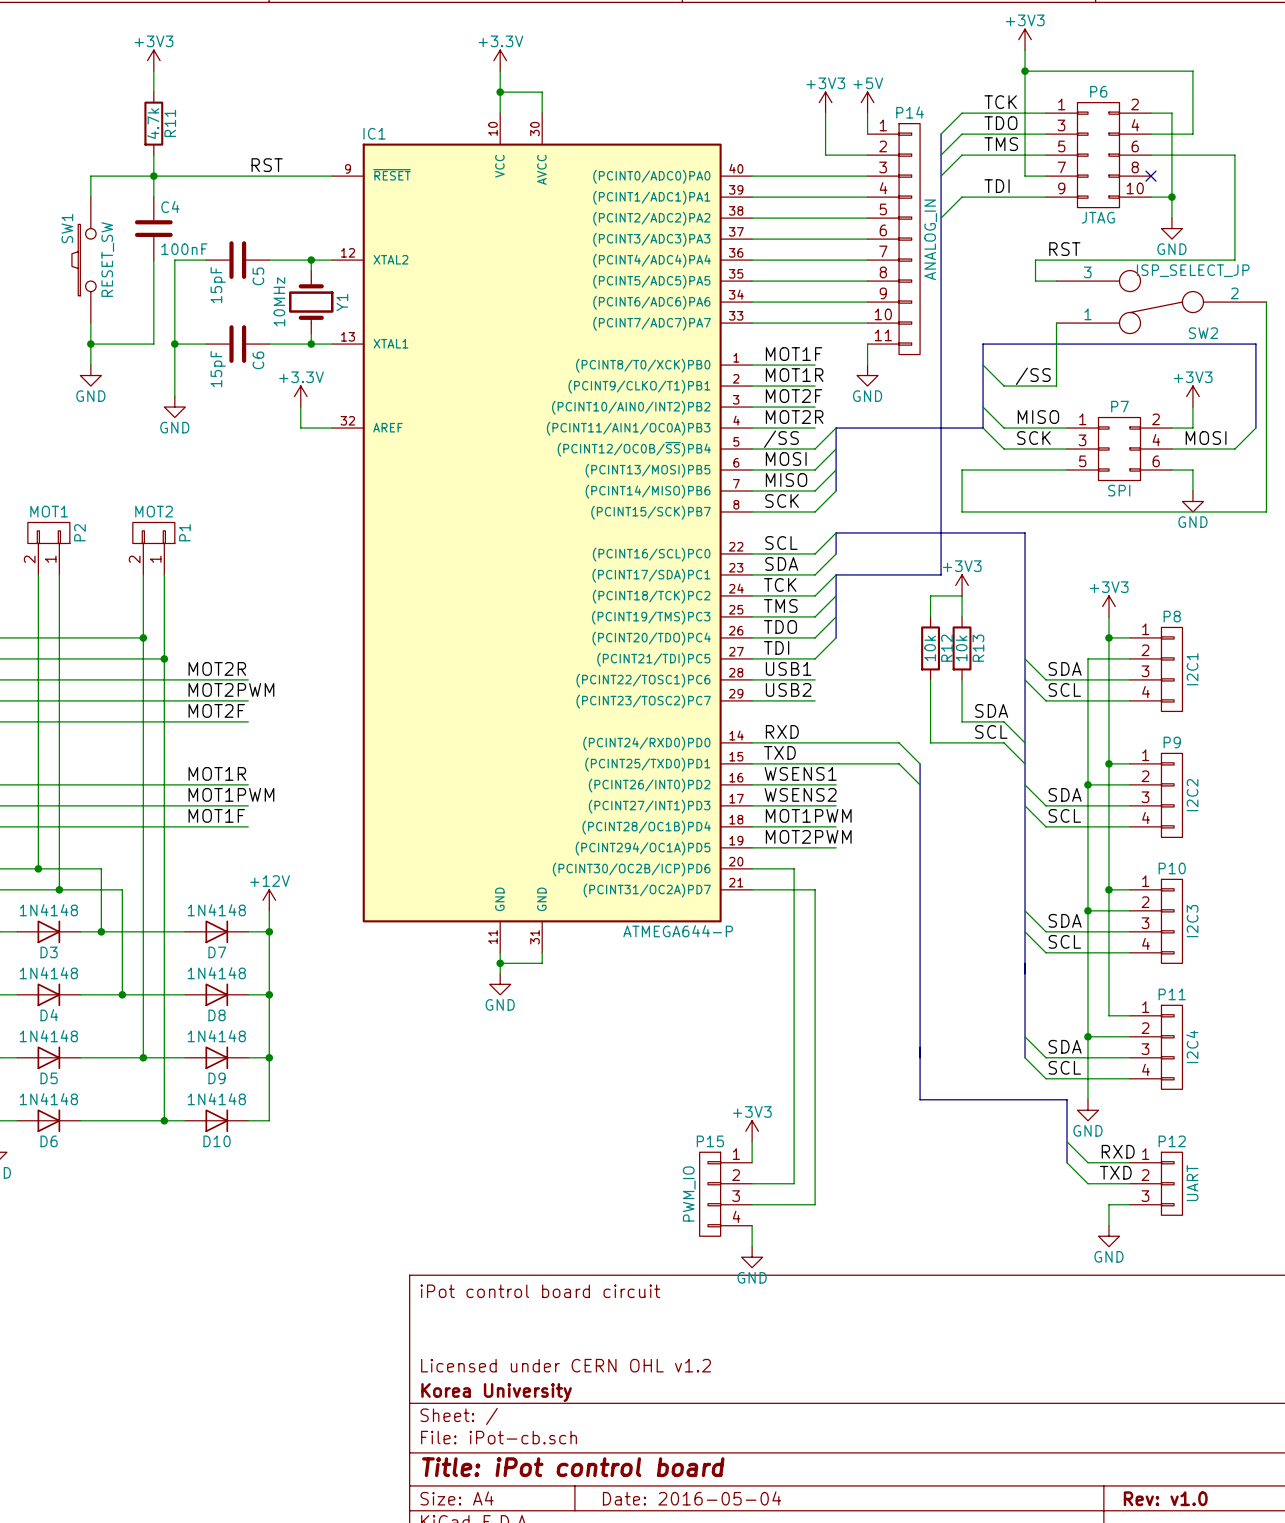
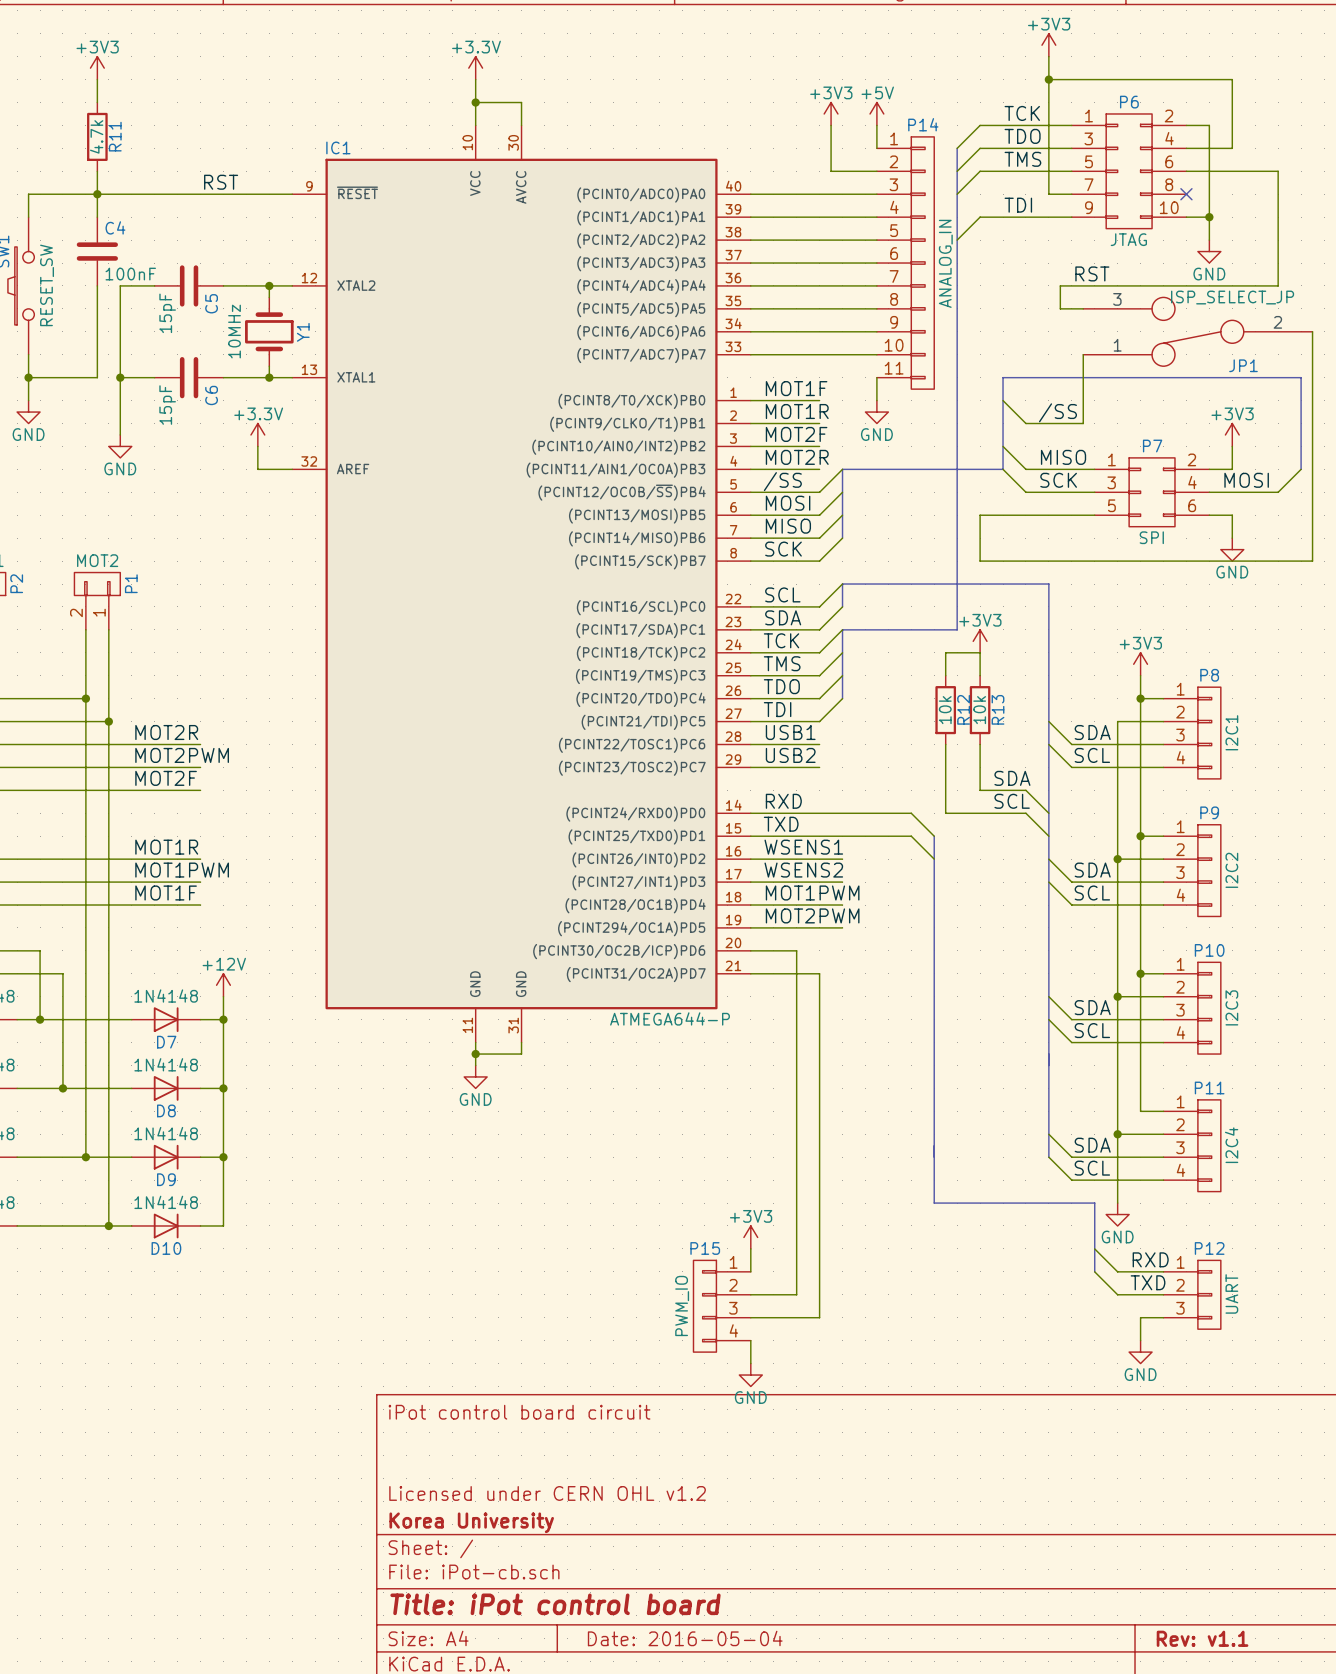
SW2 name: SW2 (1203, 333) -> JP1 (1243, 365)
title block: Rev: v1.0 (1165, 1498) -> Rev: v1.1 (1202, 1638)

